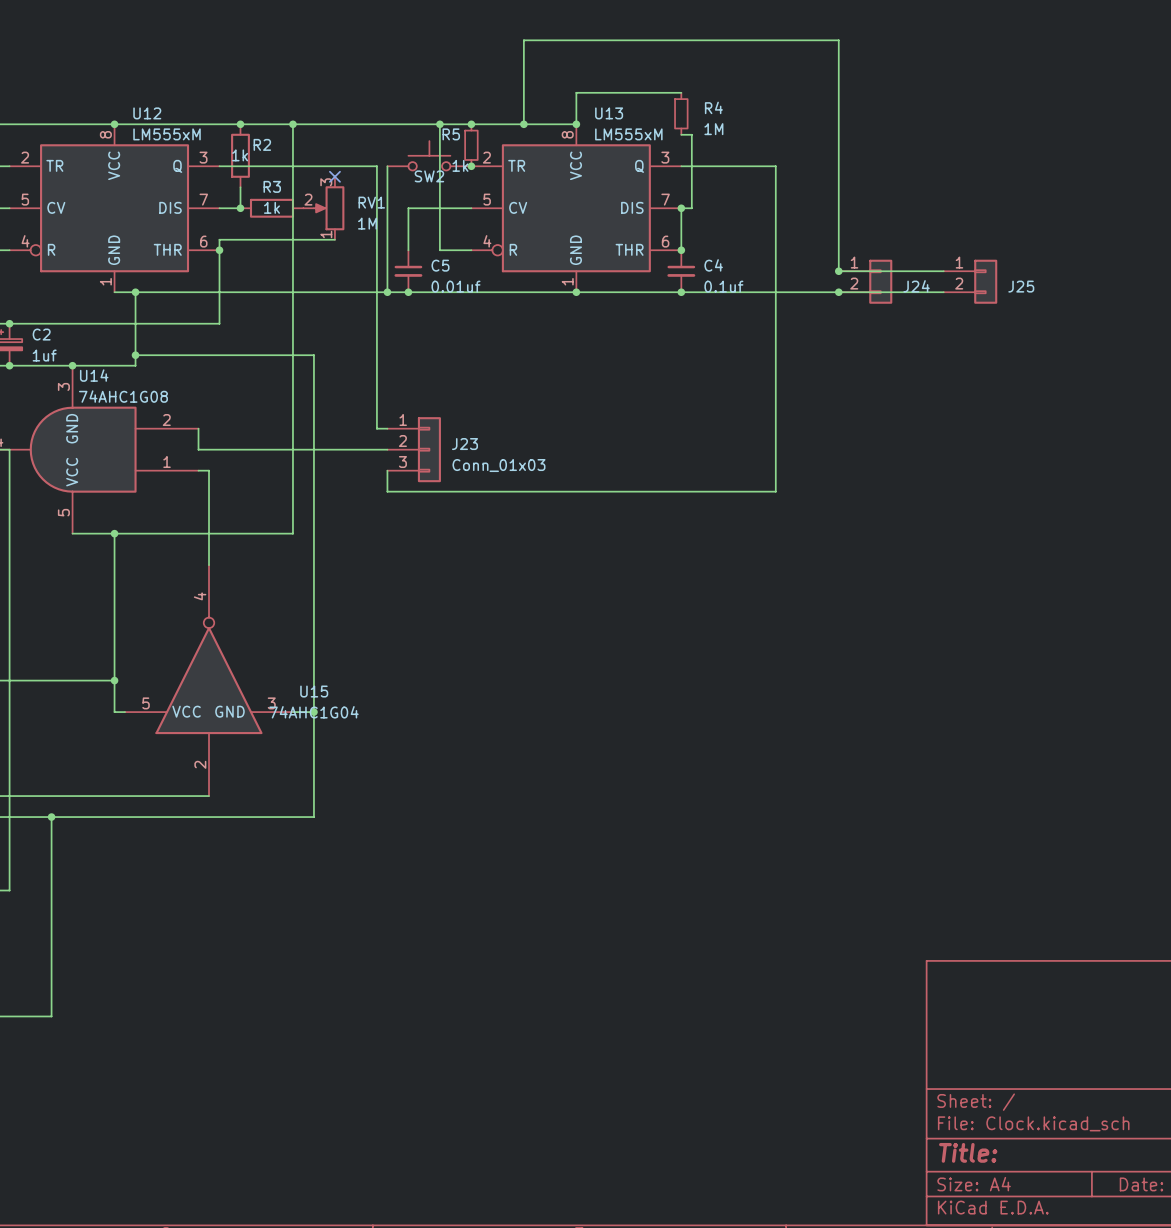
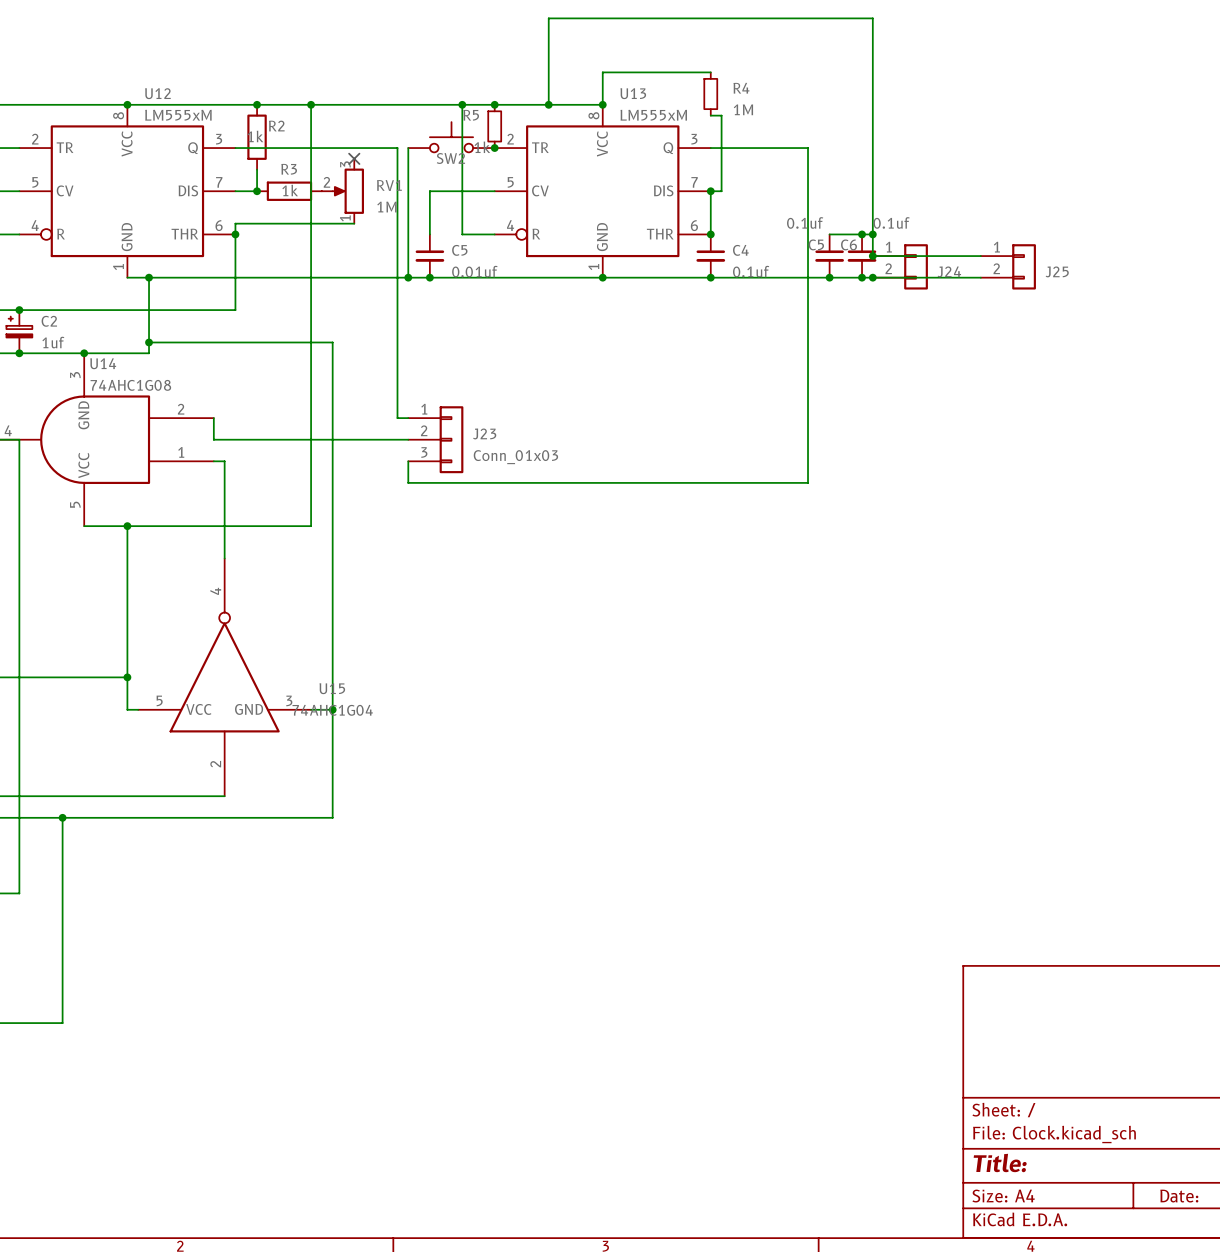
wire: none -> (829, 234) (872, 234)
junction: none -> (862, 234)
junction: none -> (872, 234)
C5: none -> 0.1uf (829, 256)
C6: none -> 0.1uf (862, 256)
junction: none -> (829, 277)
junction: none -> (862, 277)

